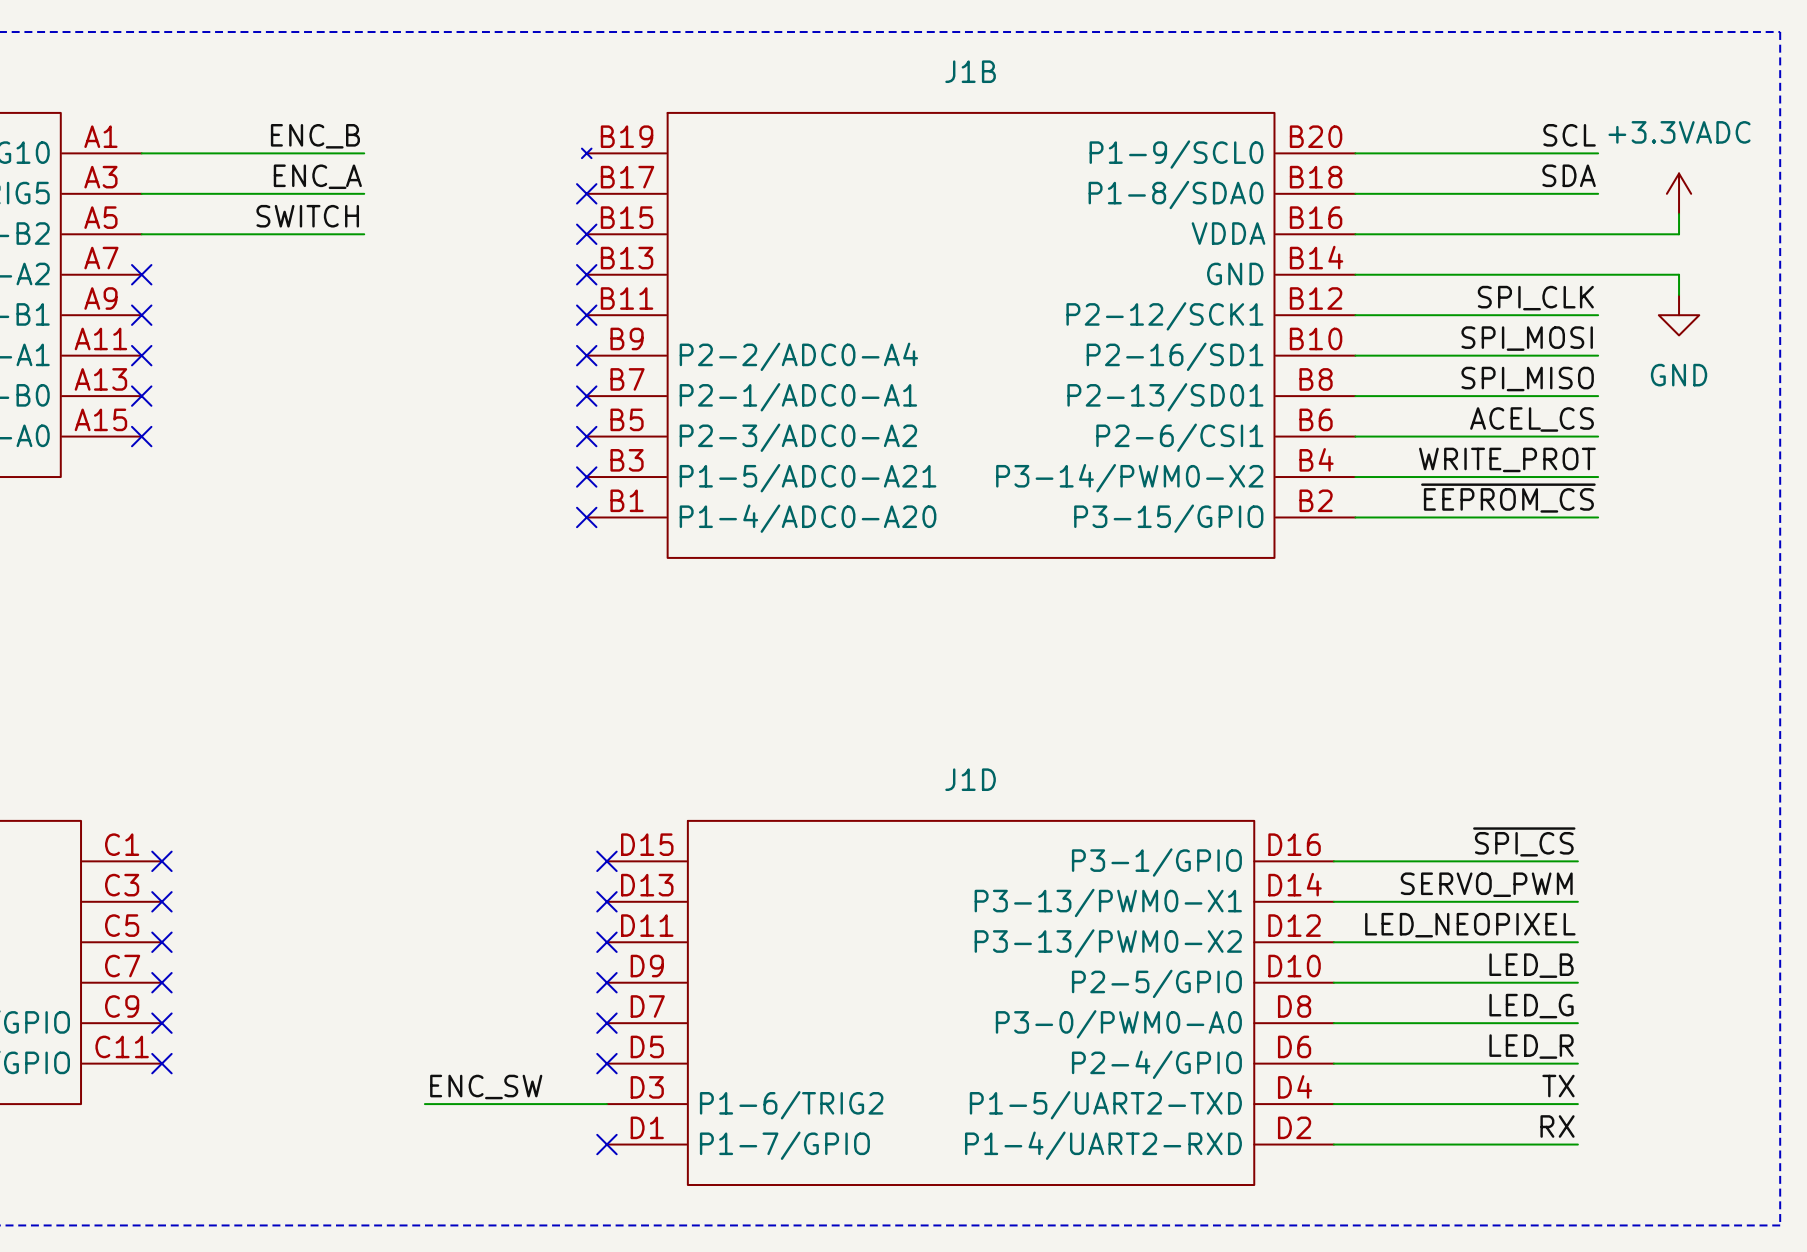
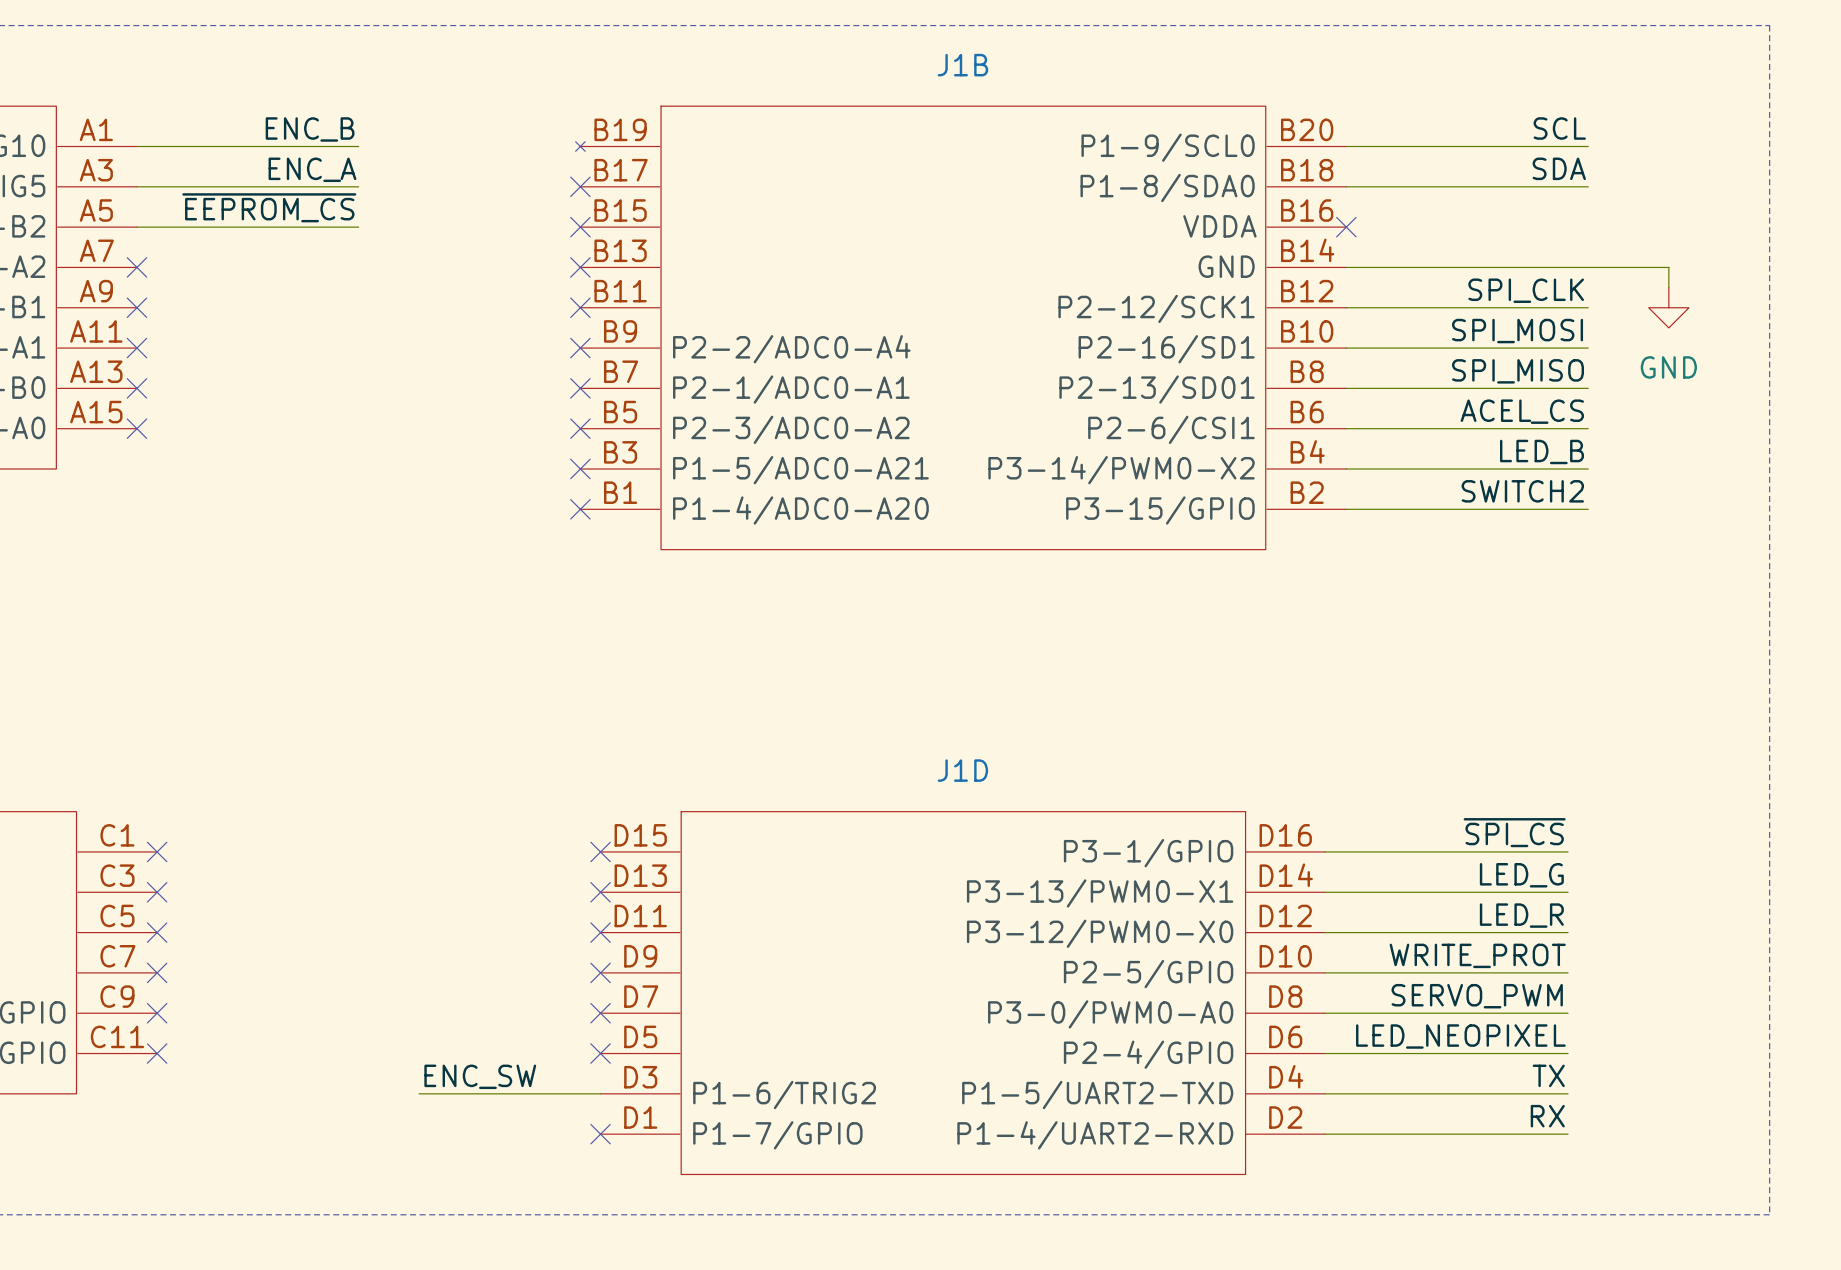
power symbol: +3.3VADC (1679, 193) -> none
wire: (1679, 214) (1679, 234) (1355, 234) -> none
label: SWITCH (307, 216) -> ~{EEPROM_CS} (269, 207)
no-connect mark: none -> (1346, 227)
label: WRITE_PROT (1507, 459) -> LED_B (1542, 451)
label: ~{EEPROM_CS} (1508, 498) -> SWITCH2 (1522, 491)
label: SERVO_PWM (1486, 884) -> LED_G (1521, 875)
label: LED_NEOPIXEL (1470, 925) -> LED_R (1521, 915)
J1D pin name: P3-13/PWM0-X2 (1108, 943) -> P3-12/PWM0-X0 (1100, 933)
label: LED_B (1531, 965) -> WRITE_PROT (1477, 955)
label: LED_G (1531, 1006) -> SERVO_PWM (1477, 996)
label: LED_R (1531, 1046) -> LED_NEOPIXEL (1460, 1036)

